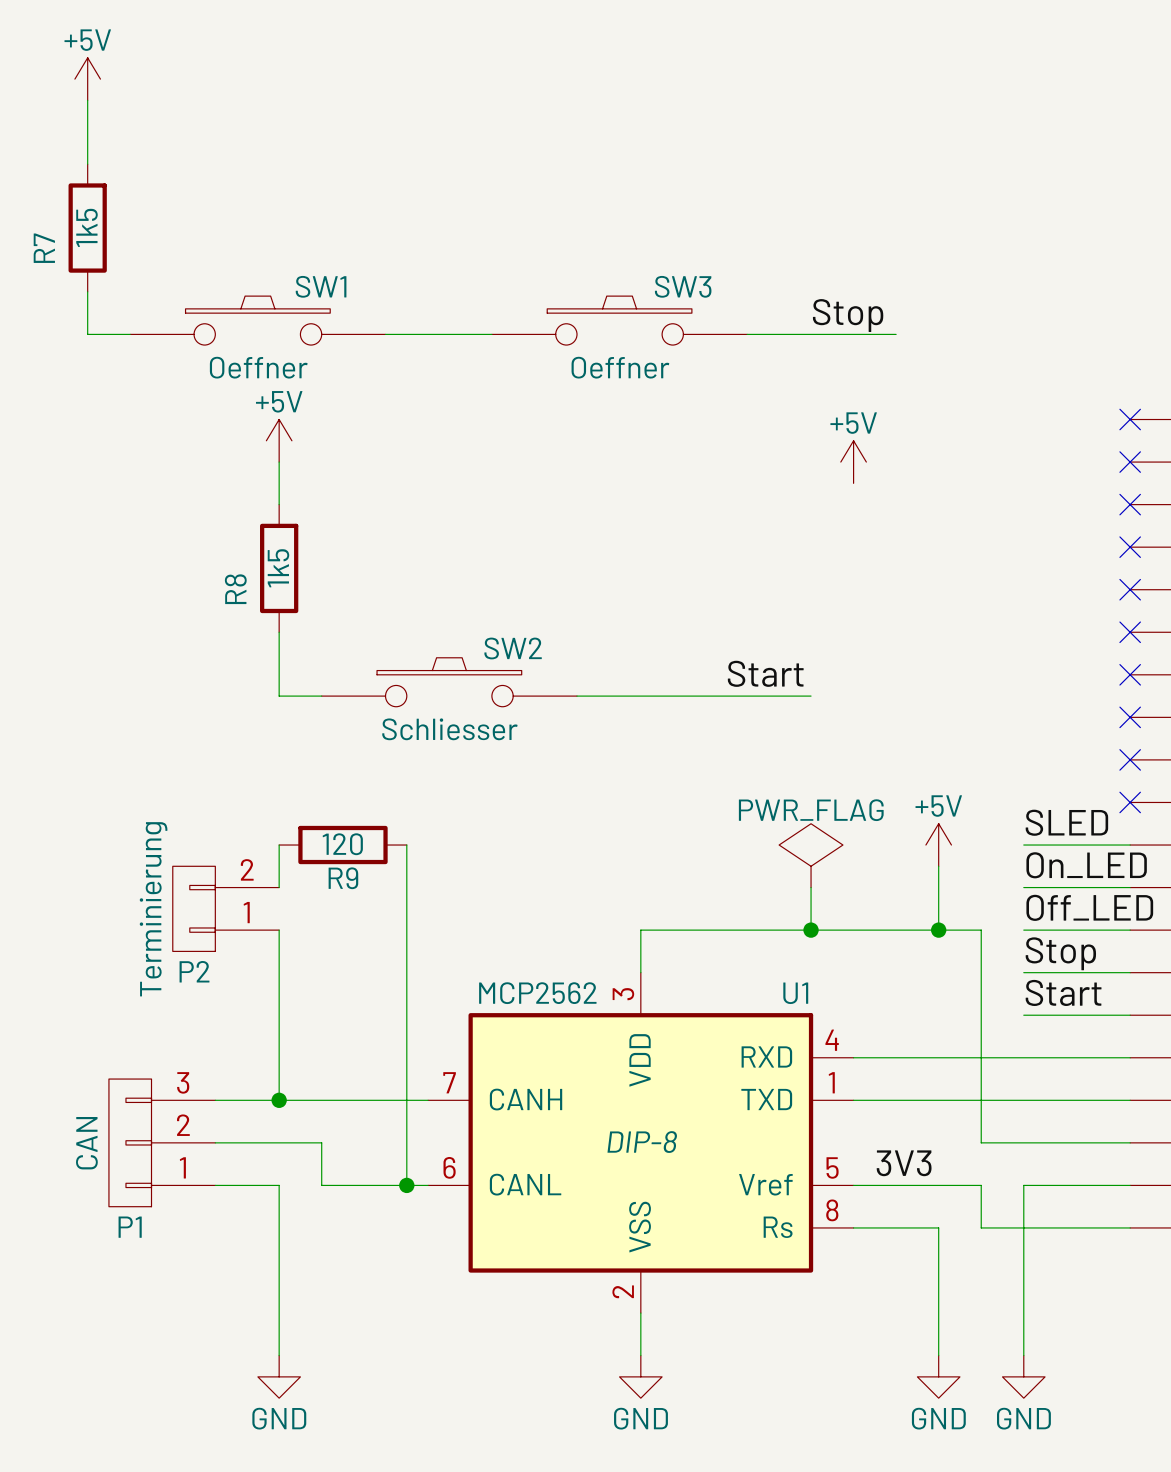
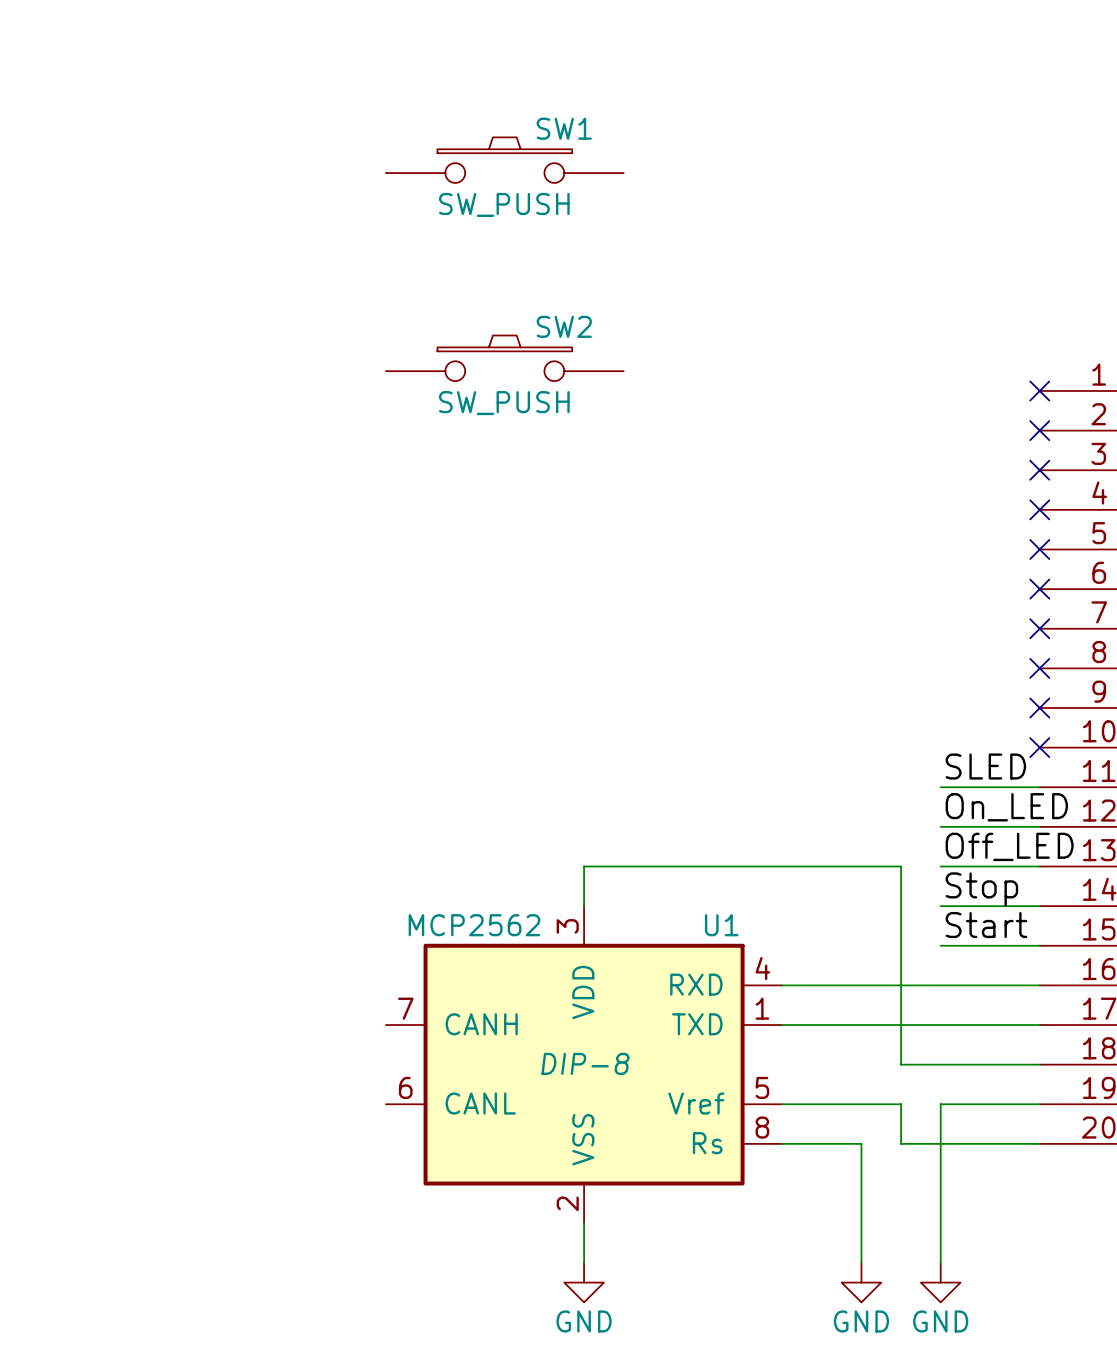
power symbol: +5V (87, 79) -> none
wire: (87, 100) (87, 164) -> none
R7: 1k5 (87, 228) -> none
wire: (87, 291) (87, 334) (130, 334) -> none
label: Stop (848, 315) -> none
SW1 position: (257, 320) -> (504, 160)
SW3: Oeffner (619, 320) -> none
wire: (385, 334) (491, 334) -> none
wire: (747, 334) (896, 334) -> none
SW1 value: Oeffner (258, 367) -> SW_PUSH (504, 204)
power symbol: +5V (279, 440) -> none
wire: (279, 462) (279, 504) -> none
power symbol: +5V (853, 462) -> none
R8: 1k5 (279, 568) -> none
wire: (279, 632) (279, 696) (321, 696) -> none
label: Start (765, 673) -> none
SW2 position: (449, 682) -> (504, 358)
wire: (577, 696) (811, 696) -> none
SW2 value: Schliesser (449, 729) -> SW_PUSH (504, 403)
wire: (279, 845) (279, 887) -> none
R9: 120 (342, 845) -> none
wire: (406, 845) (406, 1185) -> none
power symbol: +5V (938, 845) -> none
power symbol: PWR_FLAG (811, 855) -> none
wire: (938, 866) (938, 930) -> none
wire: (811, 887) (811, 930) -> none
P2: Terminierung (225, 908) -> none
wire: (279, 930) (279, 1100) -> none
junction: (811, 930) -> none
junction: (938, 930) -> none
wire: (215, 1100) (428, 1100) -> none
junction: (279, 1100) -> none
P1: CAN (162, 1142) -> none
wire: (215, 1142) (321, 1142) (321, 1185) (428, 1185) -> none
label: 3V3 (904, 1163) -> none
wire: (215, 1185) (279, 1185) (279, 1355) -> none
junction: (406, 1185) -> none
power symbol: GND (279, 1376) -> none

